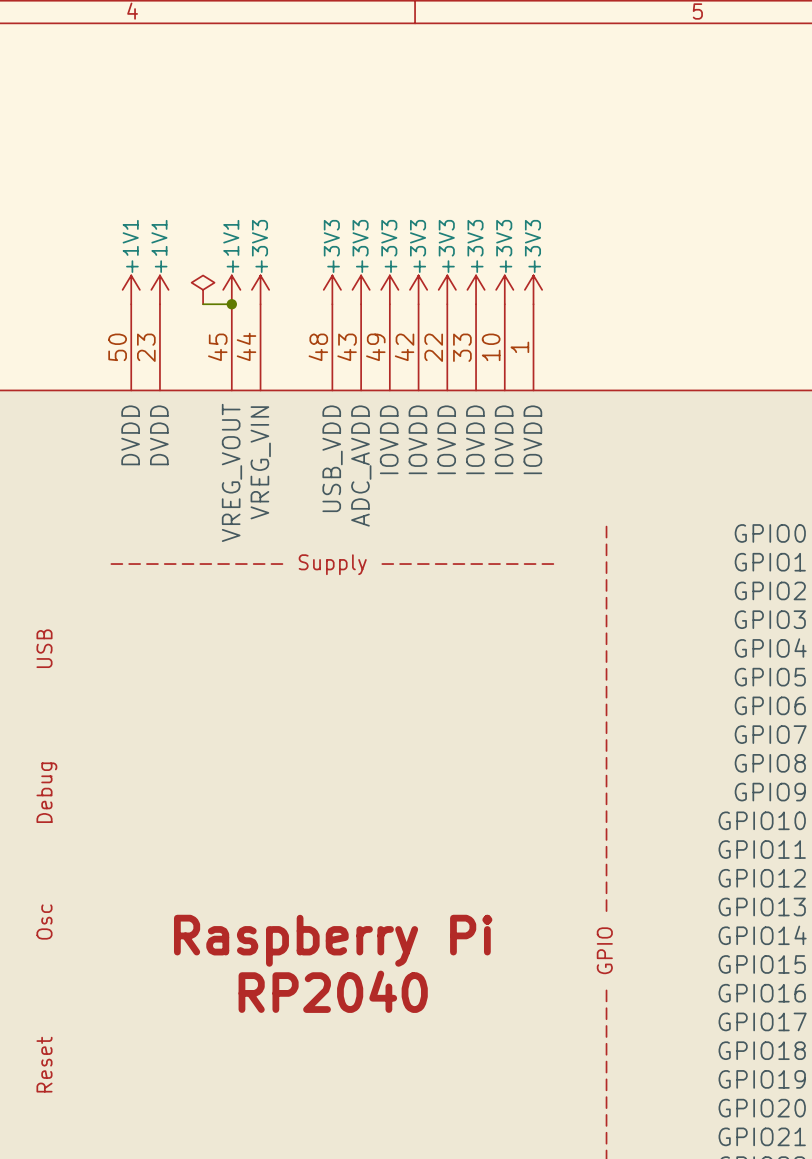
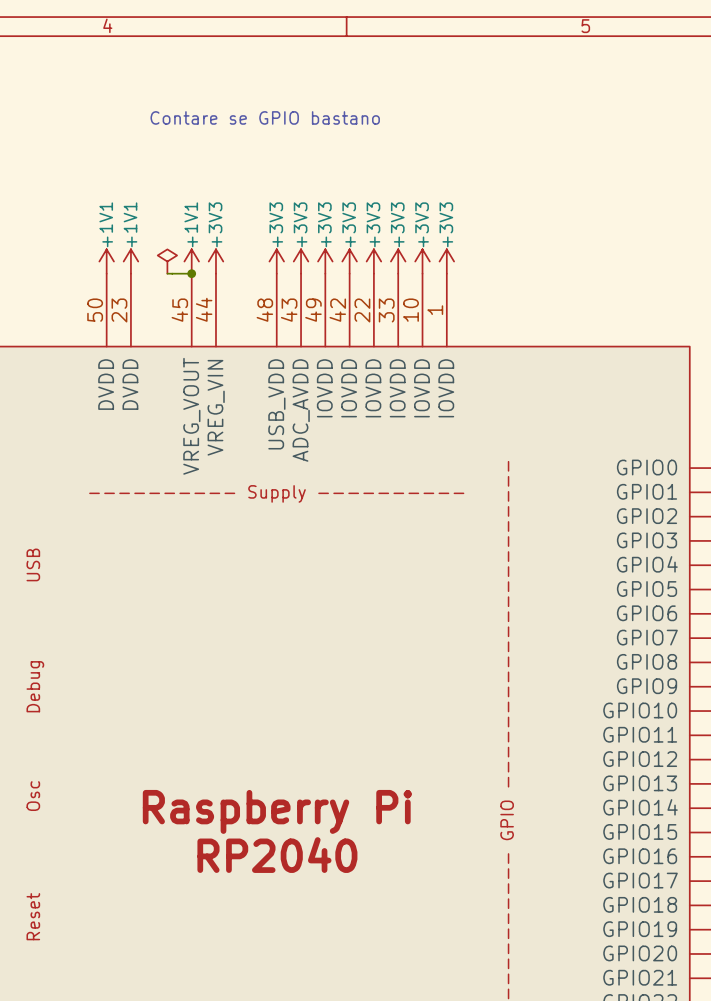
text: none -> Contare se GPIO bastano (265, 117)

